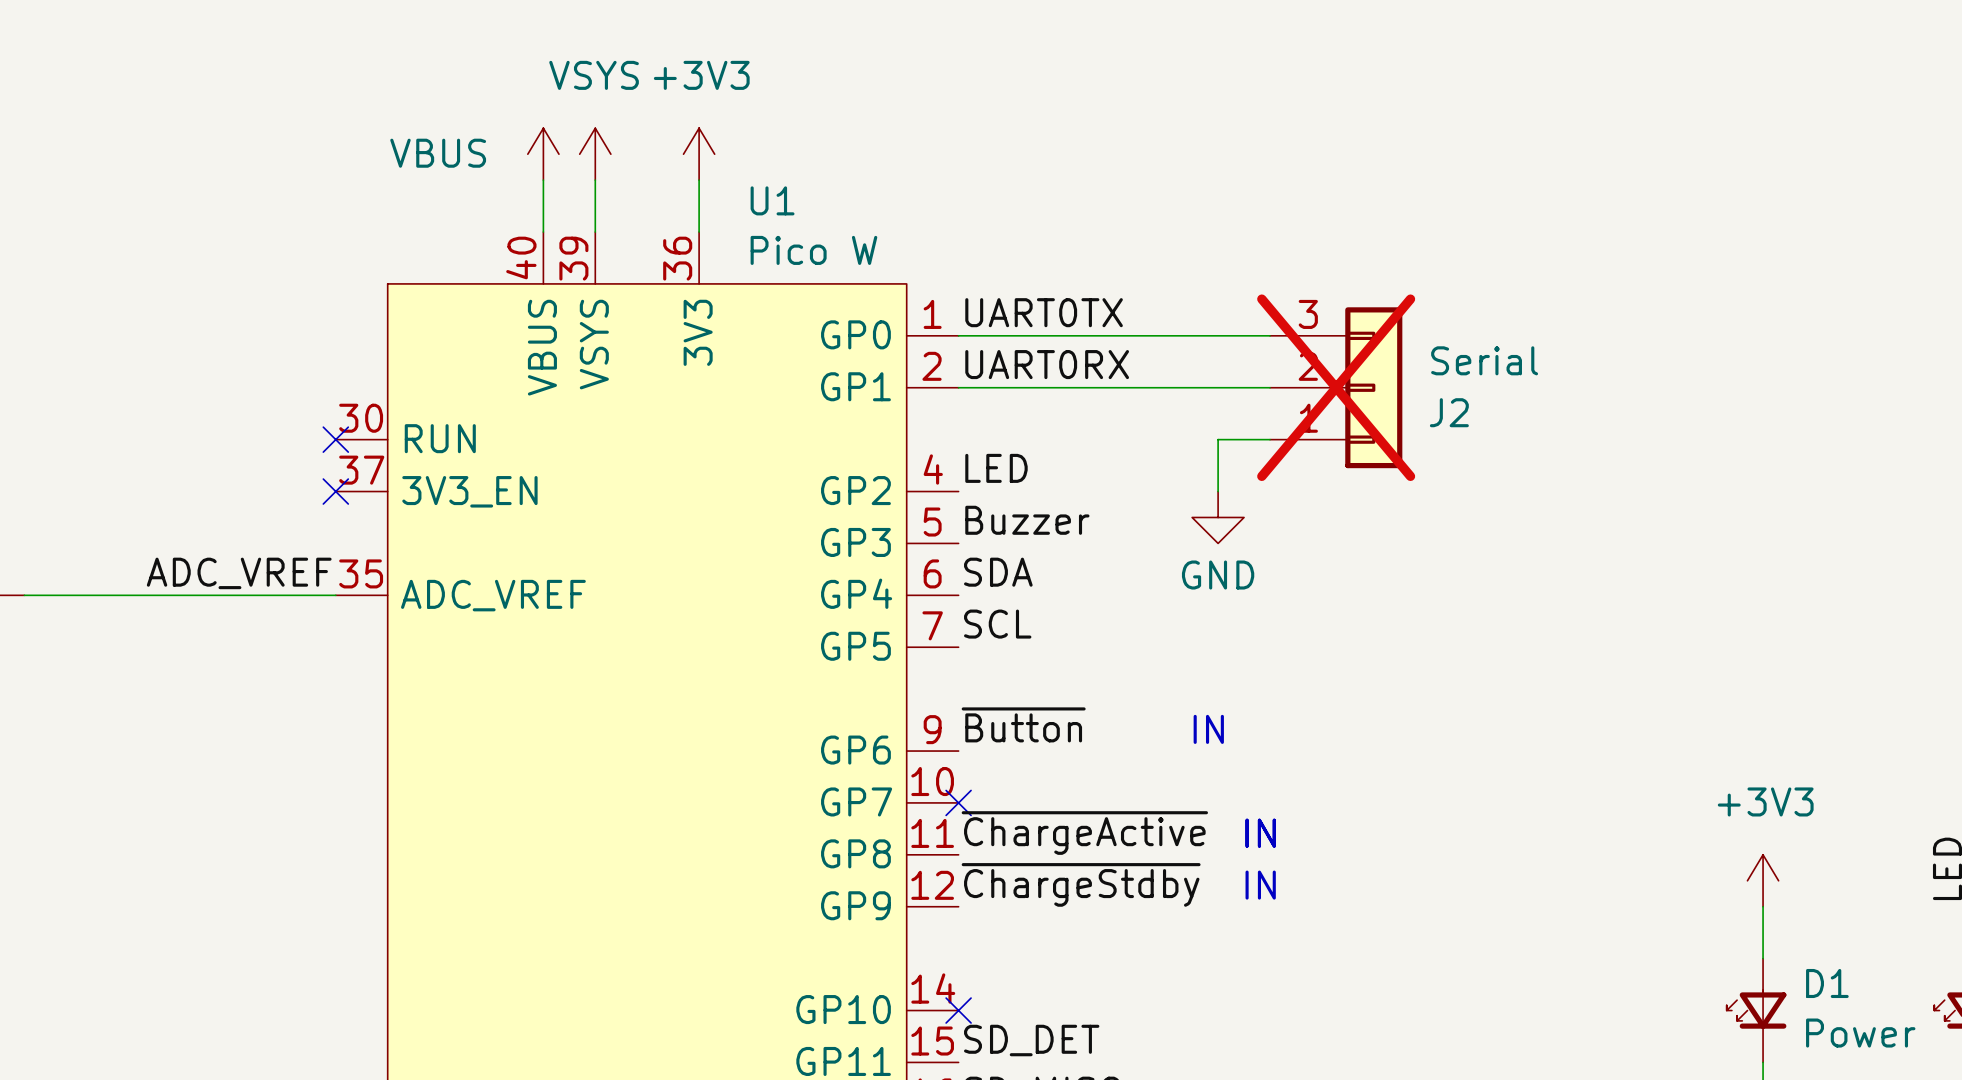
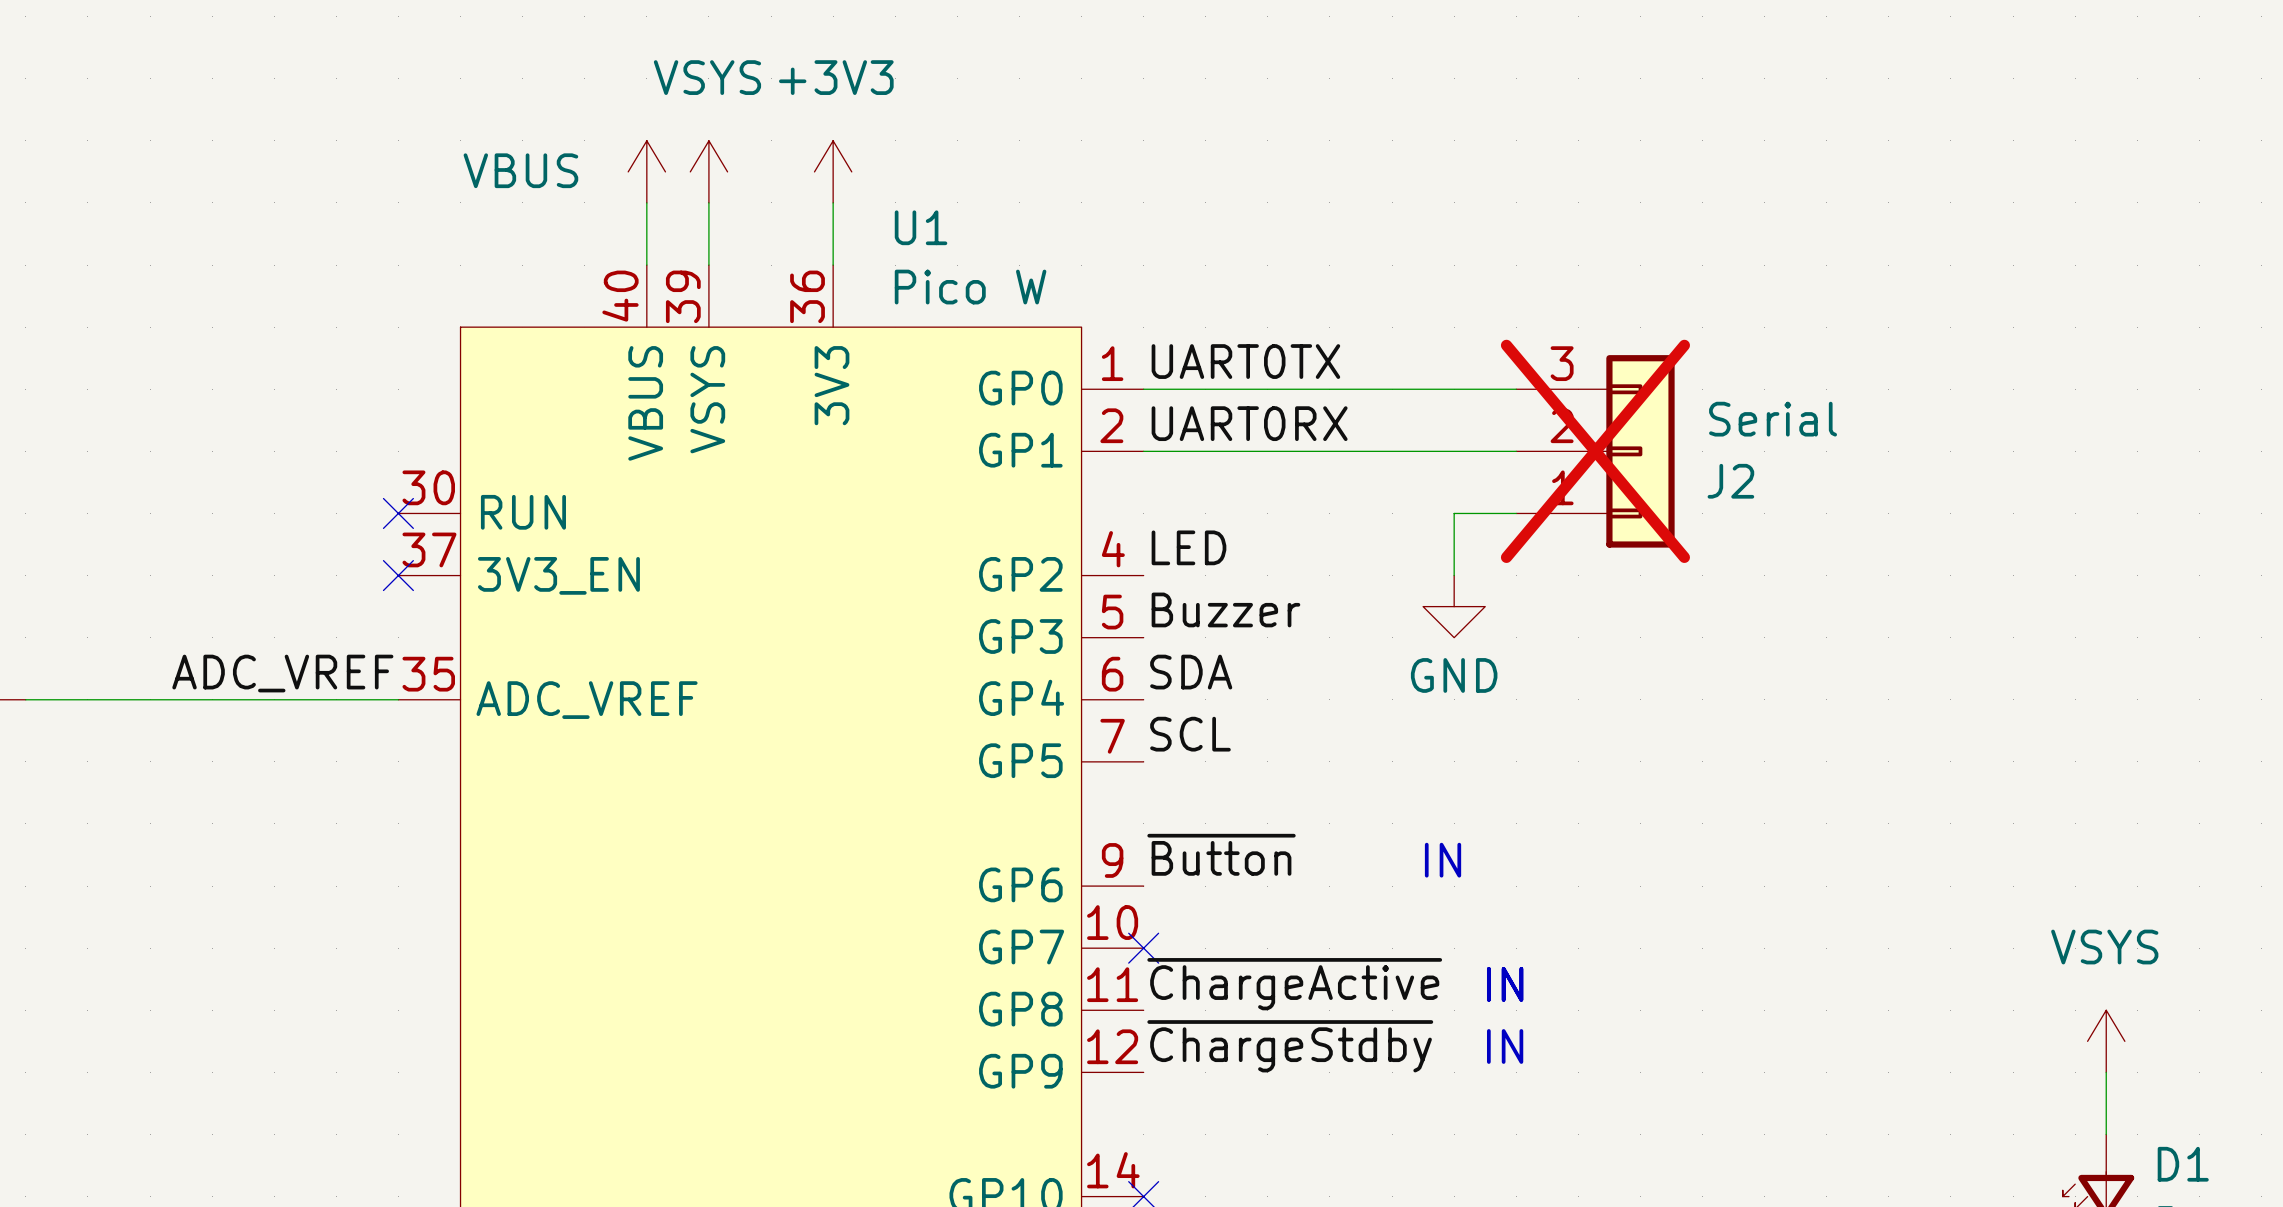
power symbol: +3V3 (1763, 880) -> VSYS (2106, 1041)

